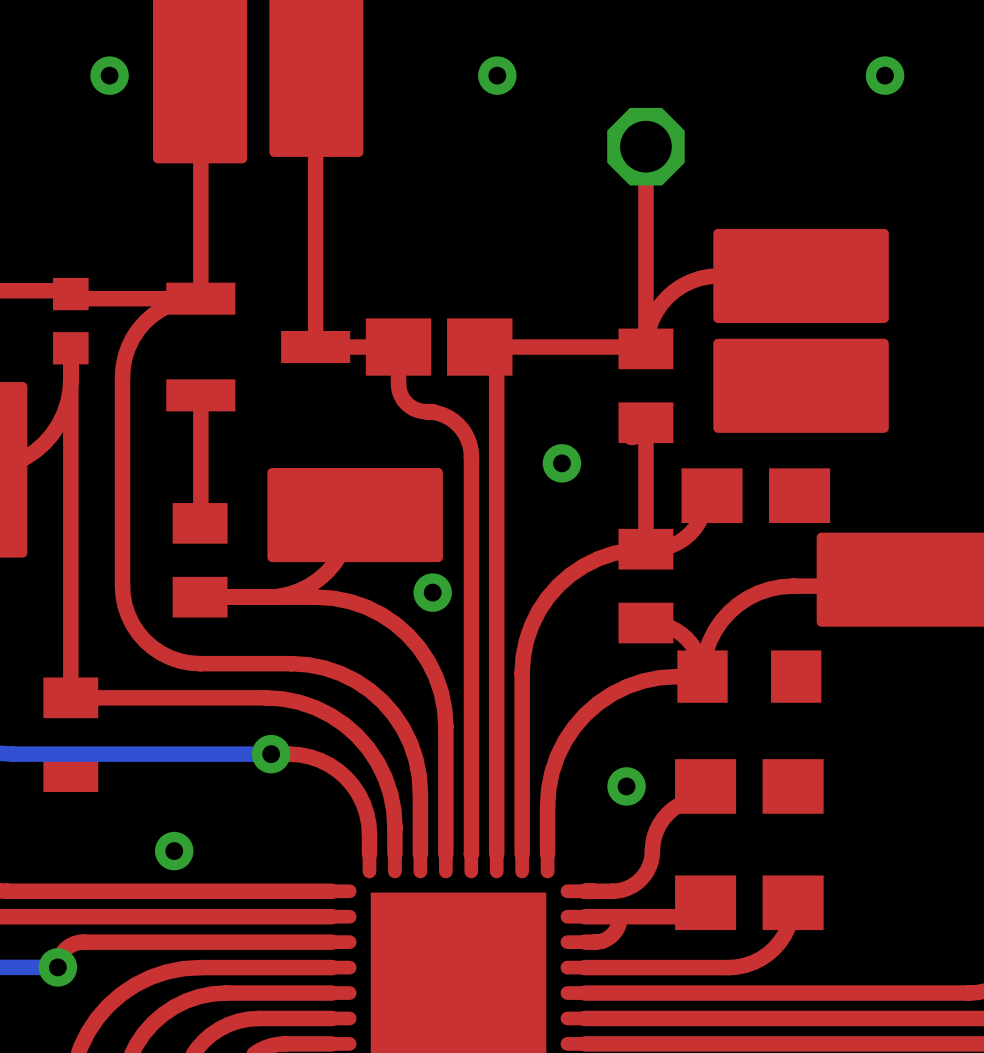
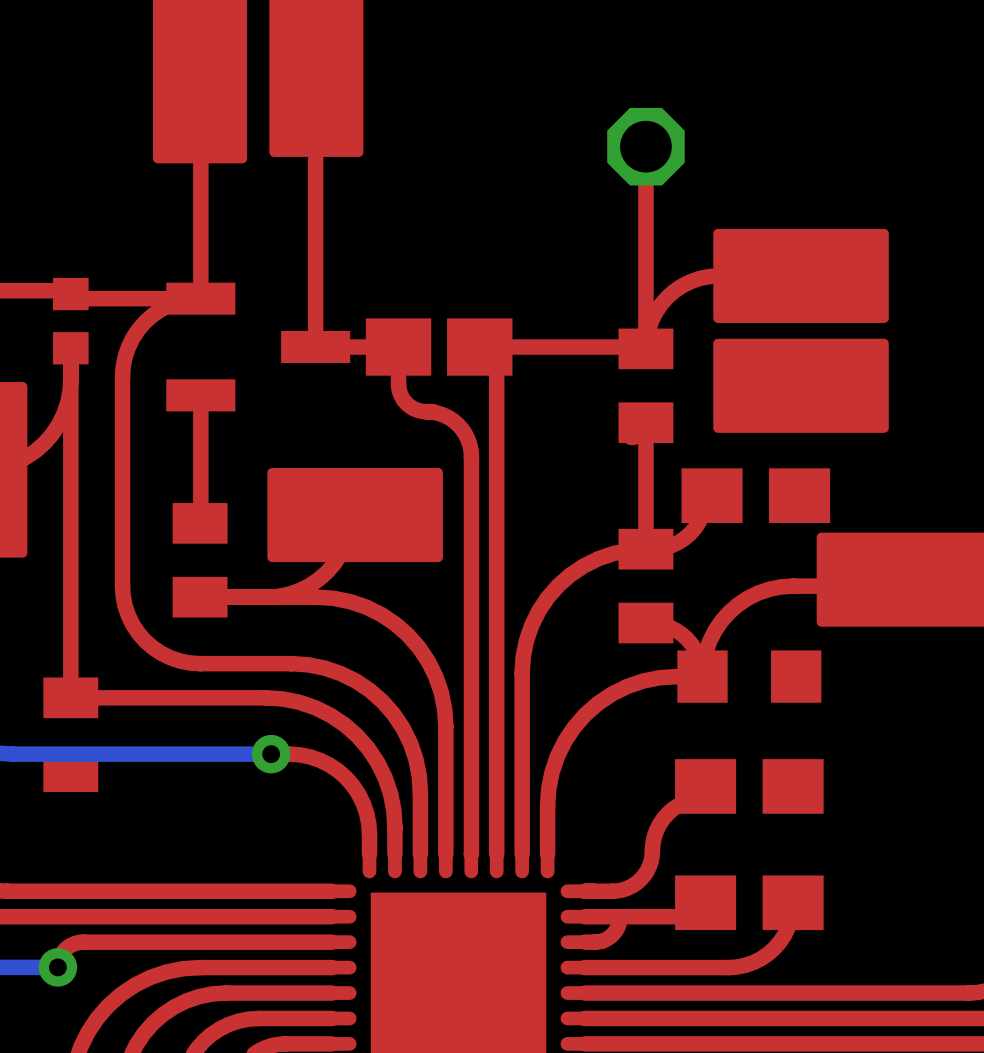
via: (109, 75) -> none
via: (497, 75) -> none
via: (885, 75) -> none
via: (561, 463) -> none
via: (432, 592) -> none
via: (626, 786) -> none
via: (174, 851) -> none

